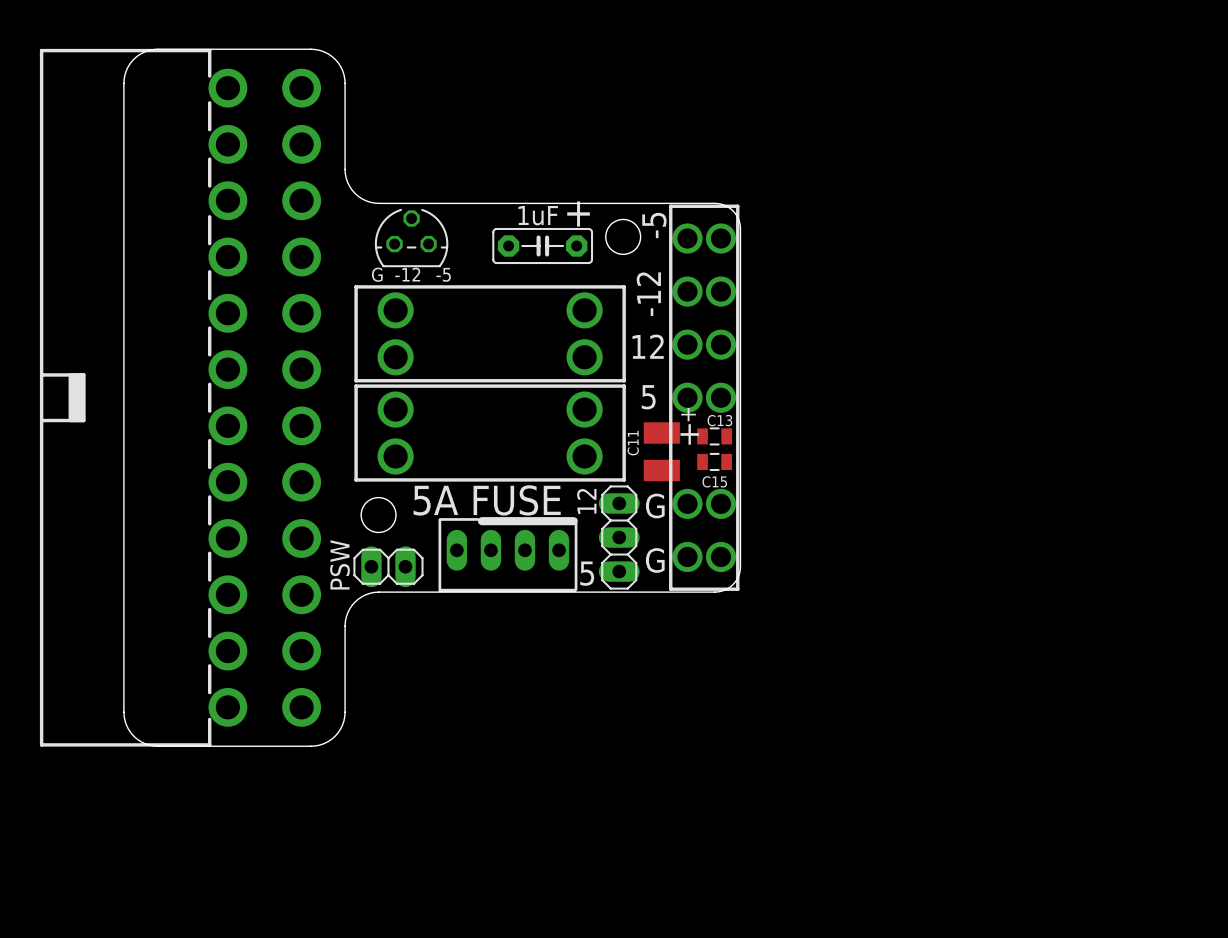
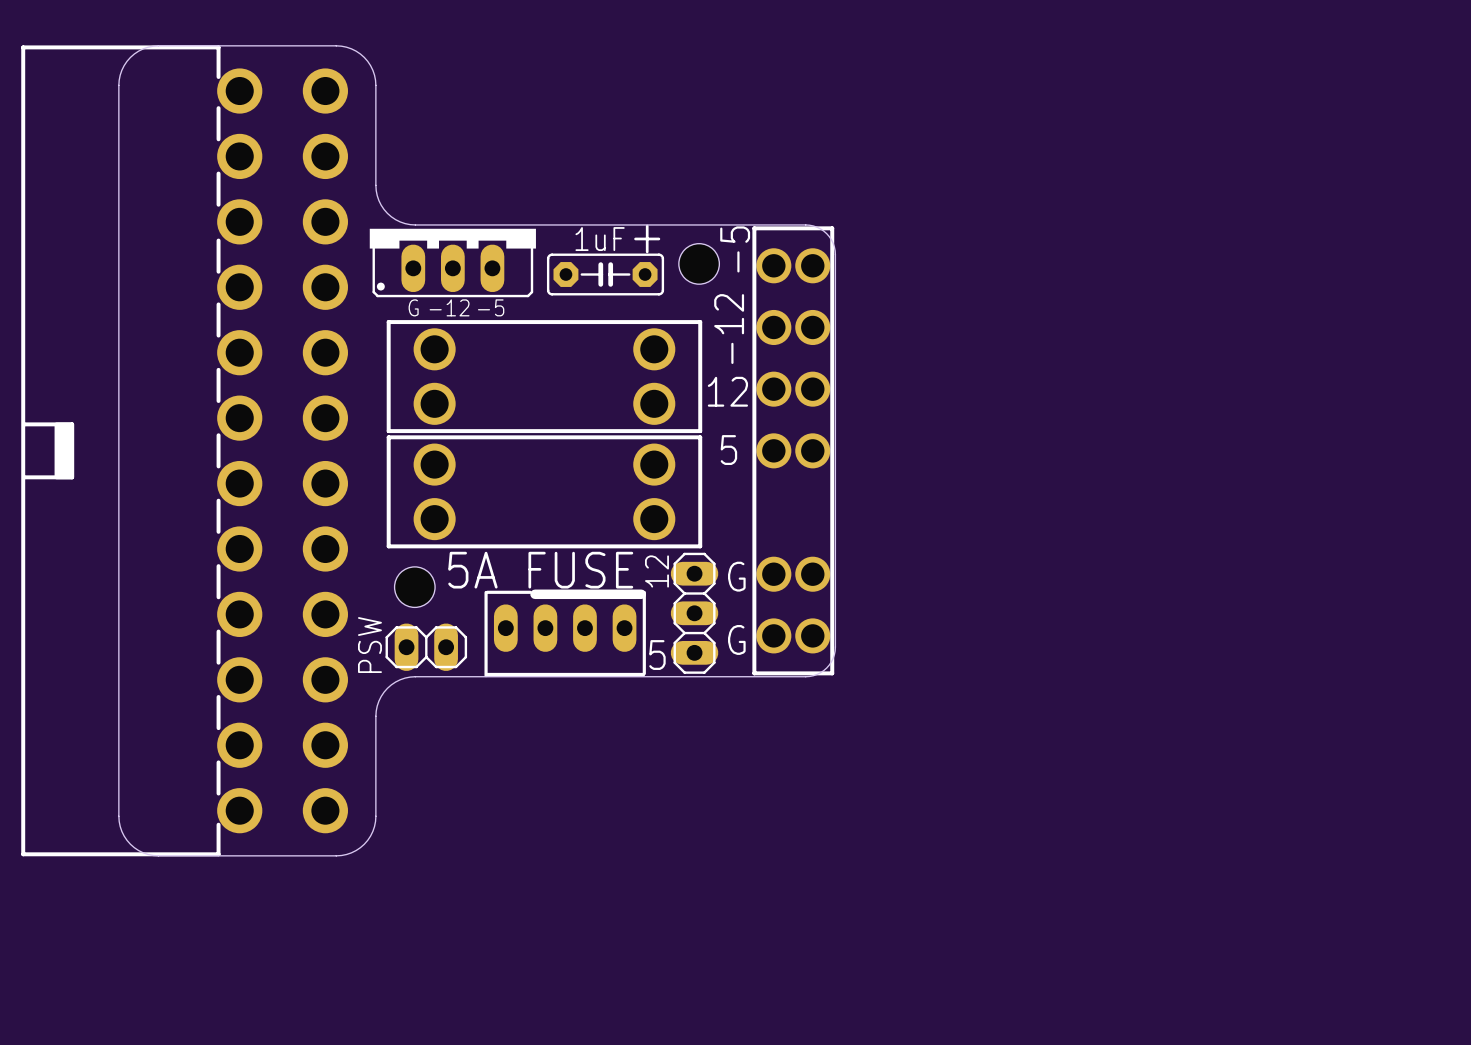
part footprint: [374, 208, 449, 268] -> [369, 228, 536, 298]
text: + (689, 434) -> none
C13: (714, 436) -> none
C11: (661, 451) -> none
C15: (714, 461) -> none

